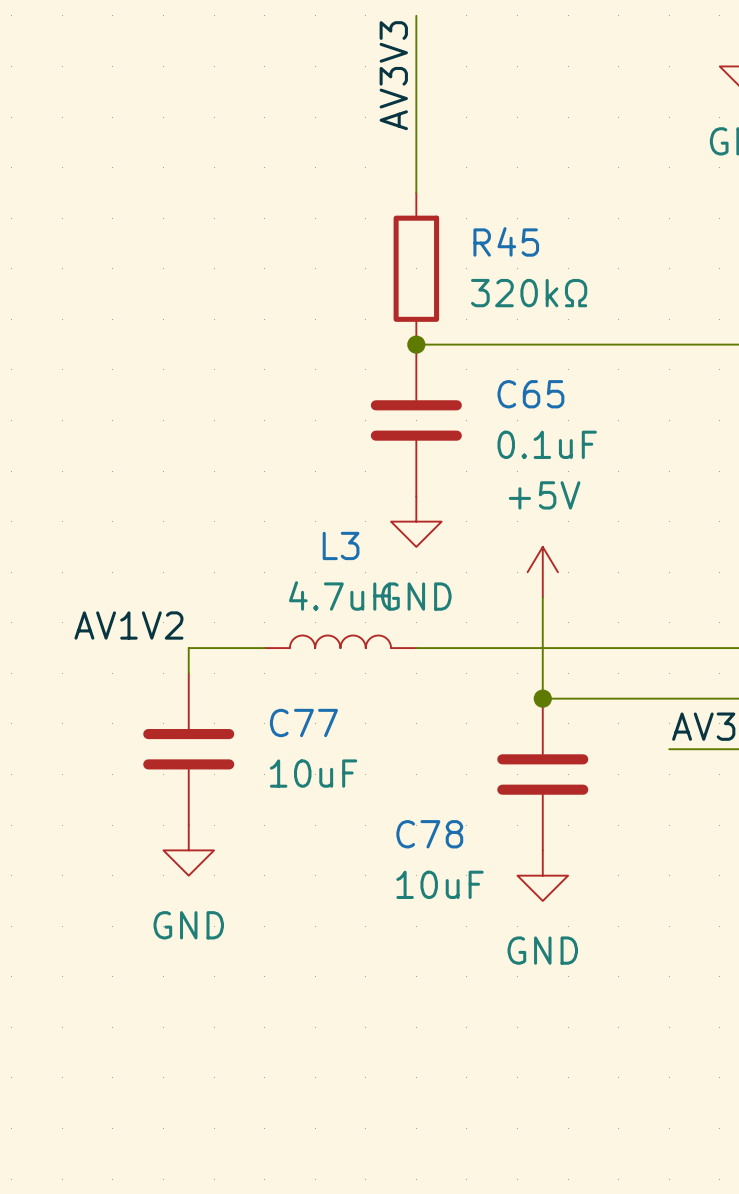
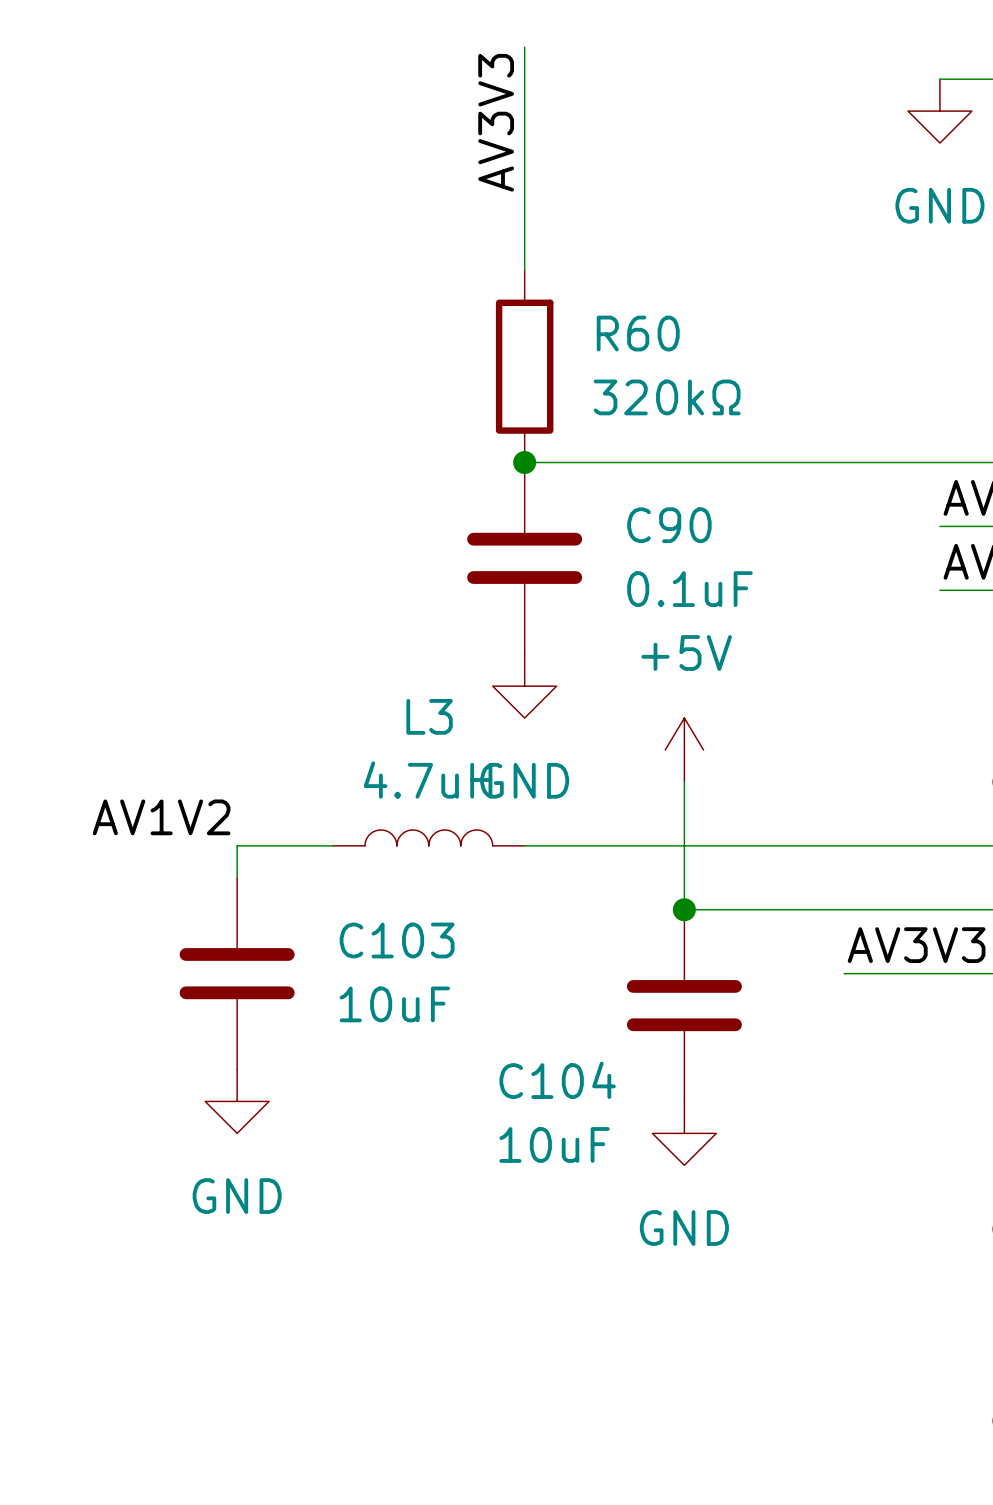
R45 name: R45 (506, 241) -> R60 (638, 333)
C65 name: C65 (530, 394) -> C90 (669, 525)
C77 name: C77 (303, 722) -> C103 (397, 940)
C78 name: C78 (429, 834) -> C104 (557, 1080)

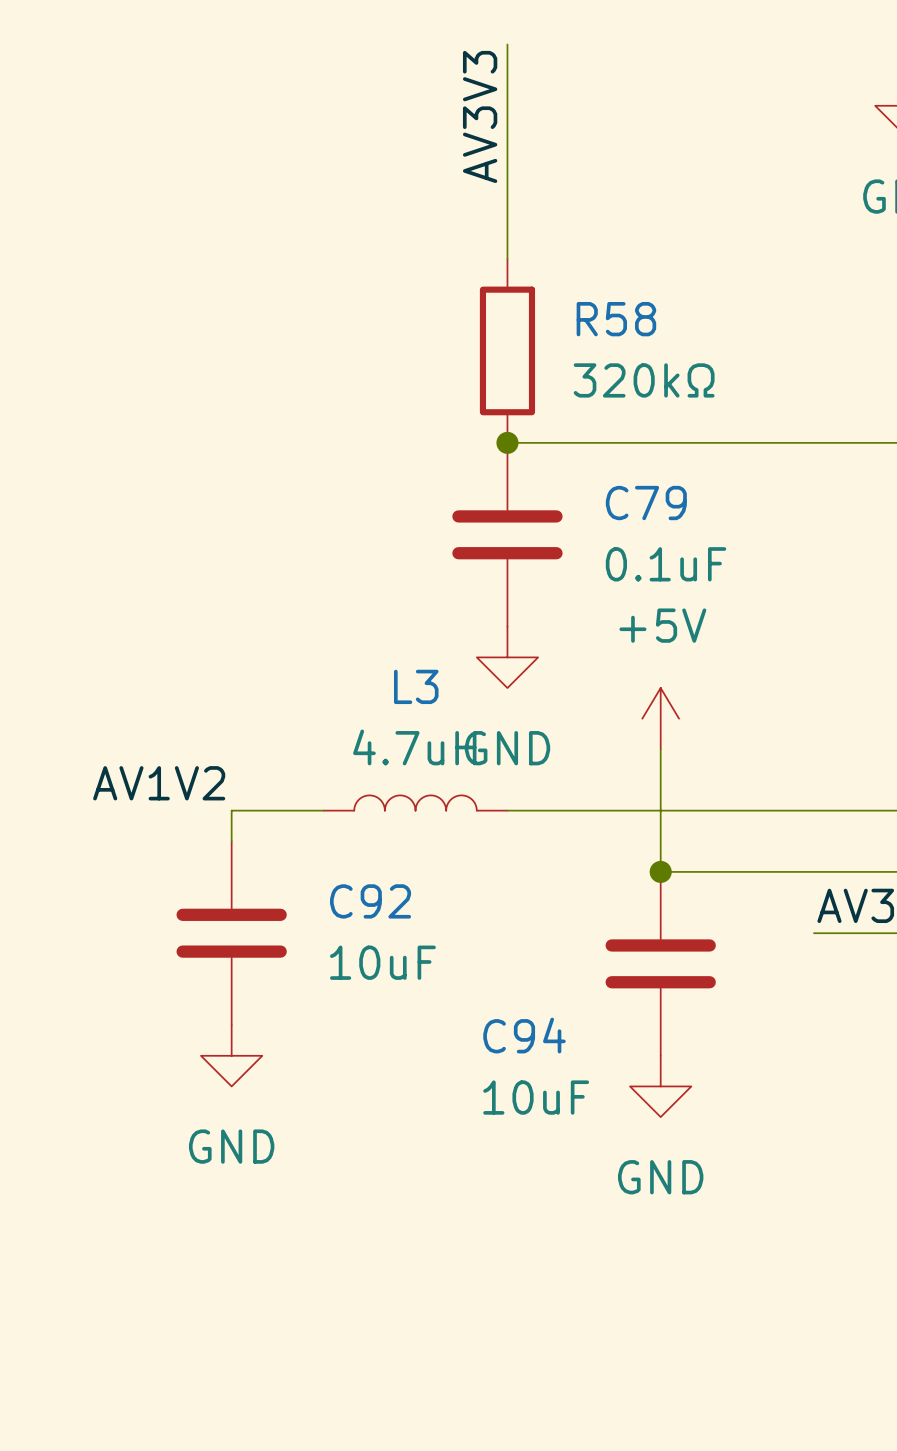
R60 name: R60 (638, 333) -> R58 (616, 319)
C90 name: C90 (669, 525) -> C79 (646, 503)
C103 name: C103 (397, 940) -> C92 (370, 901)
C104 name: C104 (557, 1080) -> C94 (524, 1035)

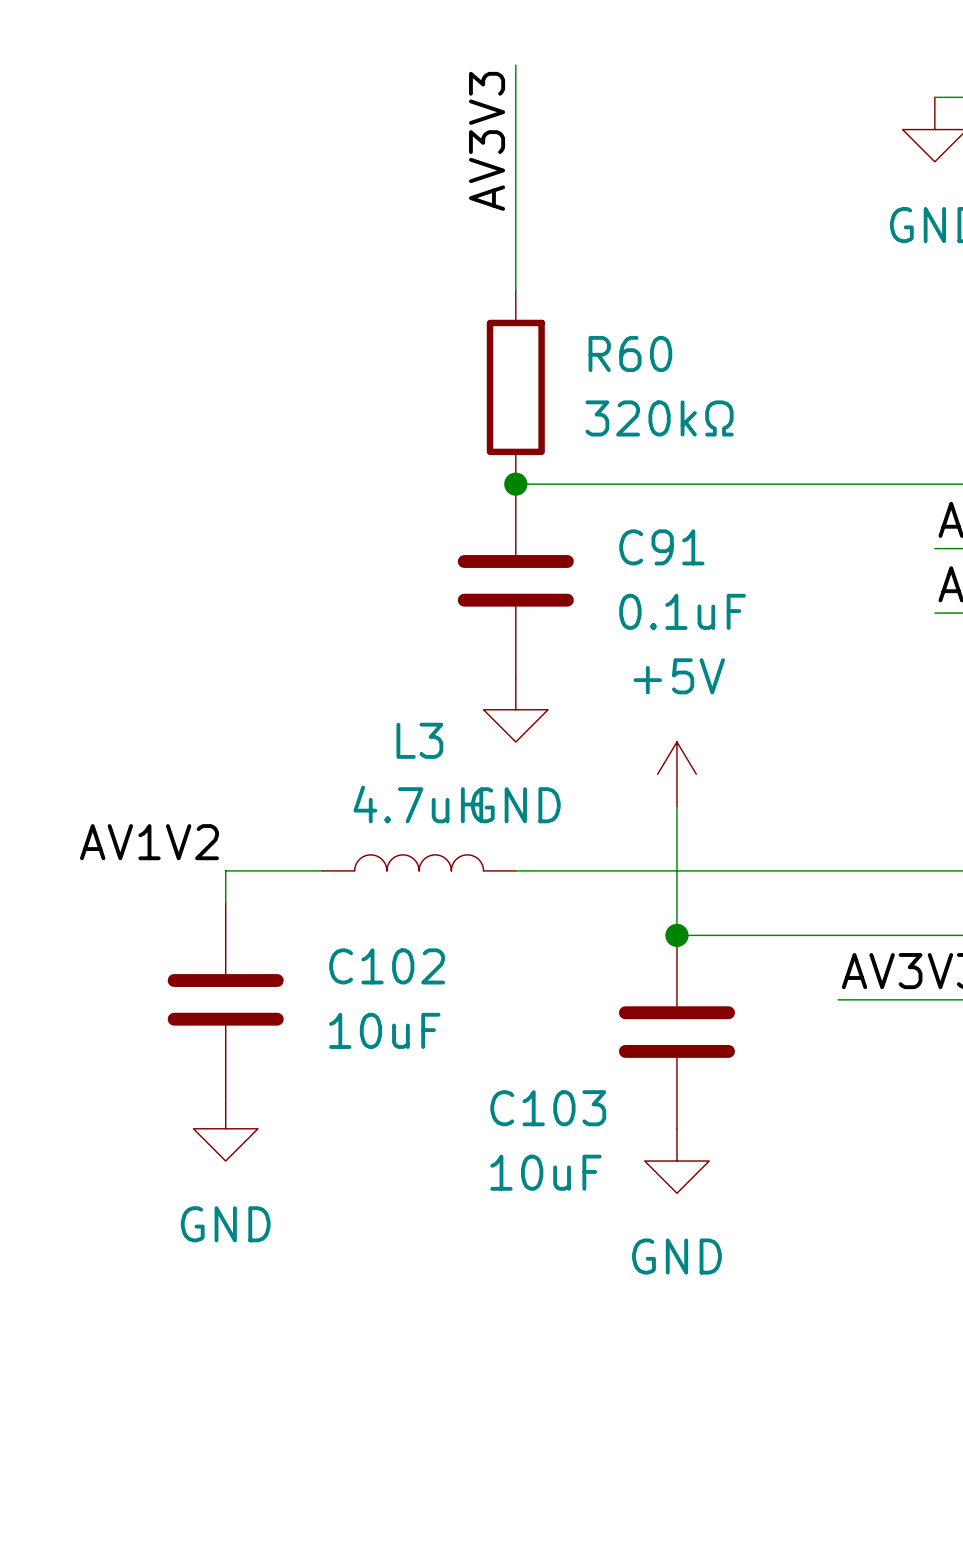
R58 name: R58 (616, 319) -> R60 (630, 353)
C79 name: C79 (646, 503) -> C91 (661, 547)
C92 name: C92 (370, 901) -> C102 (387, 966)
C94 name: C94 (524, 1035) -> C103 (548, 1108)

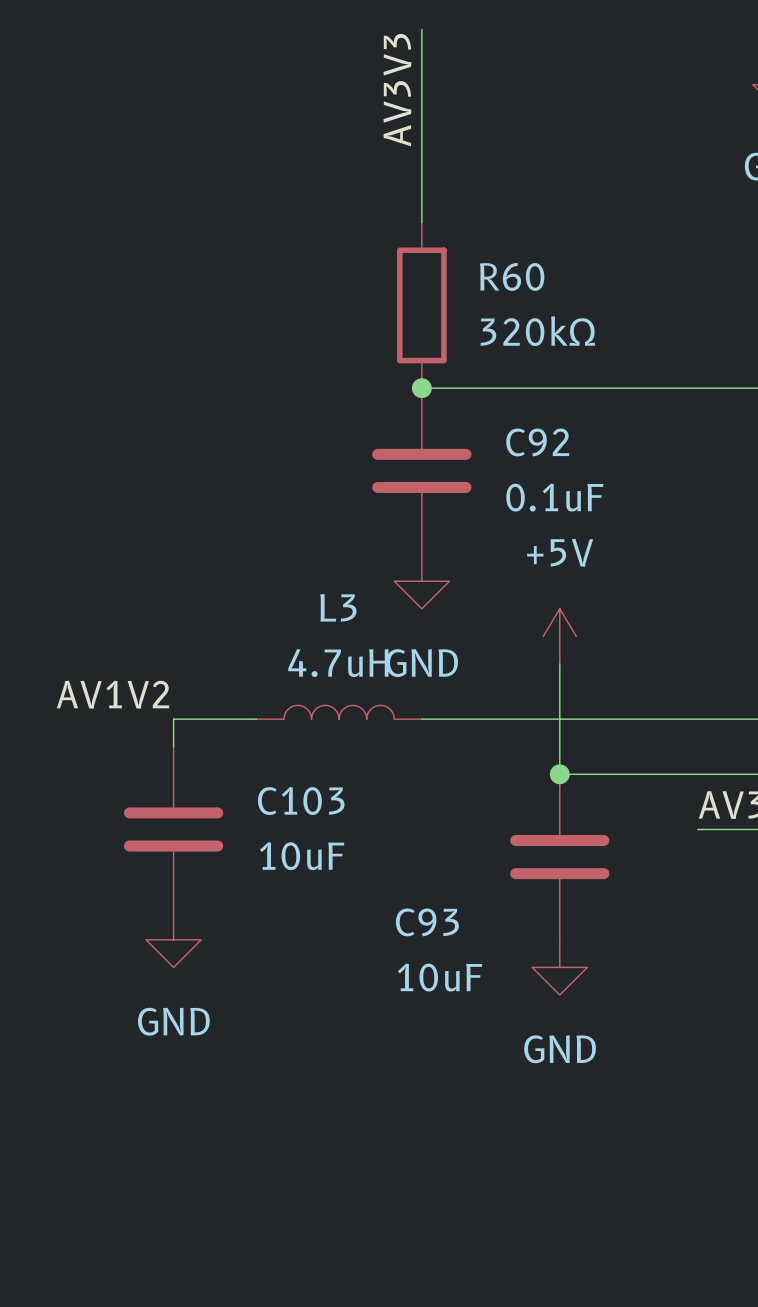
C91 name: C91 (661, 547) -> C92 (537, 442)
C102 name: C102 (387, 966) -> C103 (301, 801)
C103 name: C103 (548, 1108) -> C93 (427, 922)

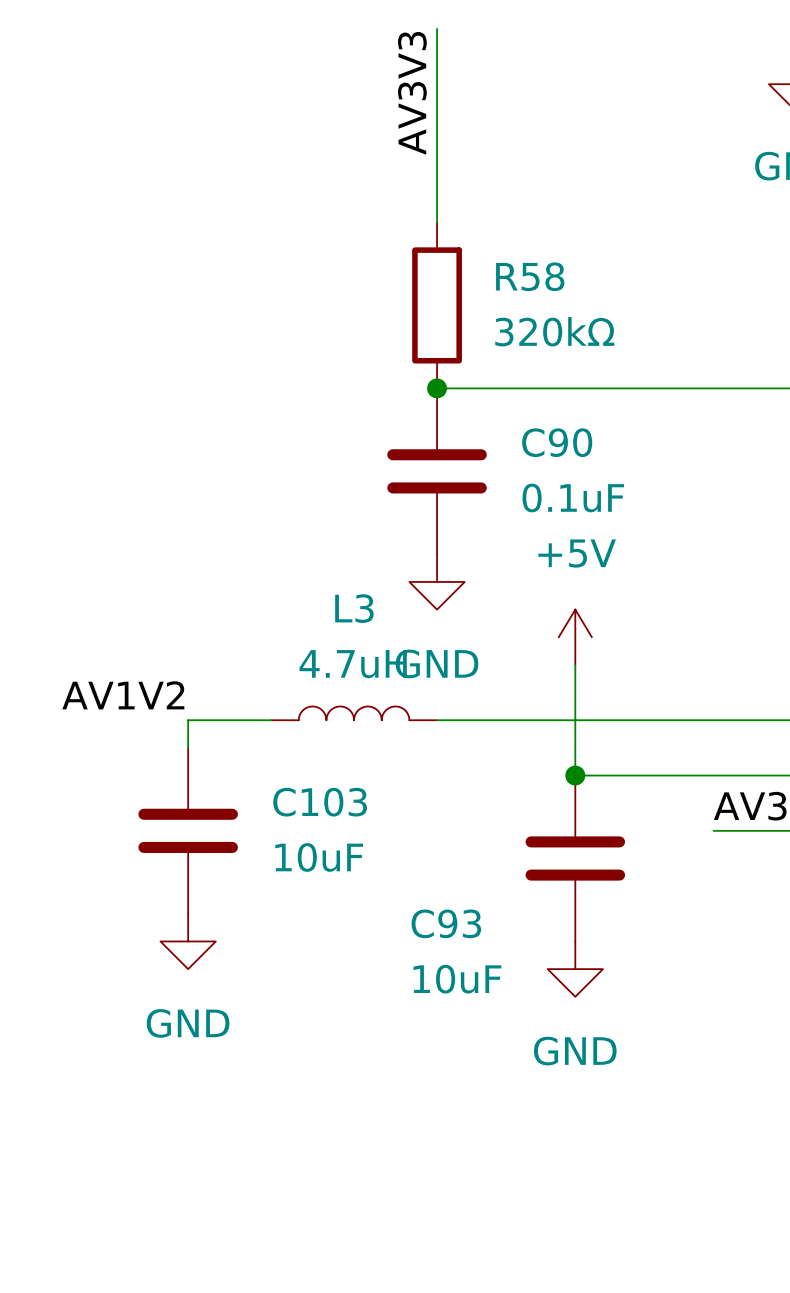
R60 name: R60 (512, 276) -> R58 (530, 276)
C92 name: C92 (537, 442) -> C90 (557, 442)

